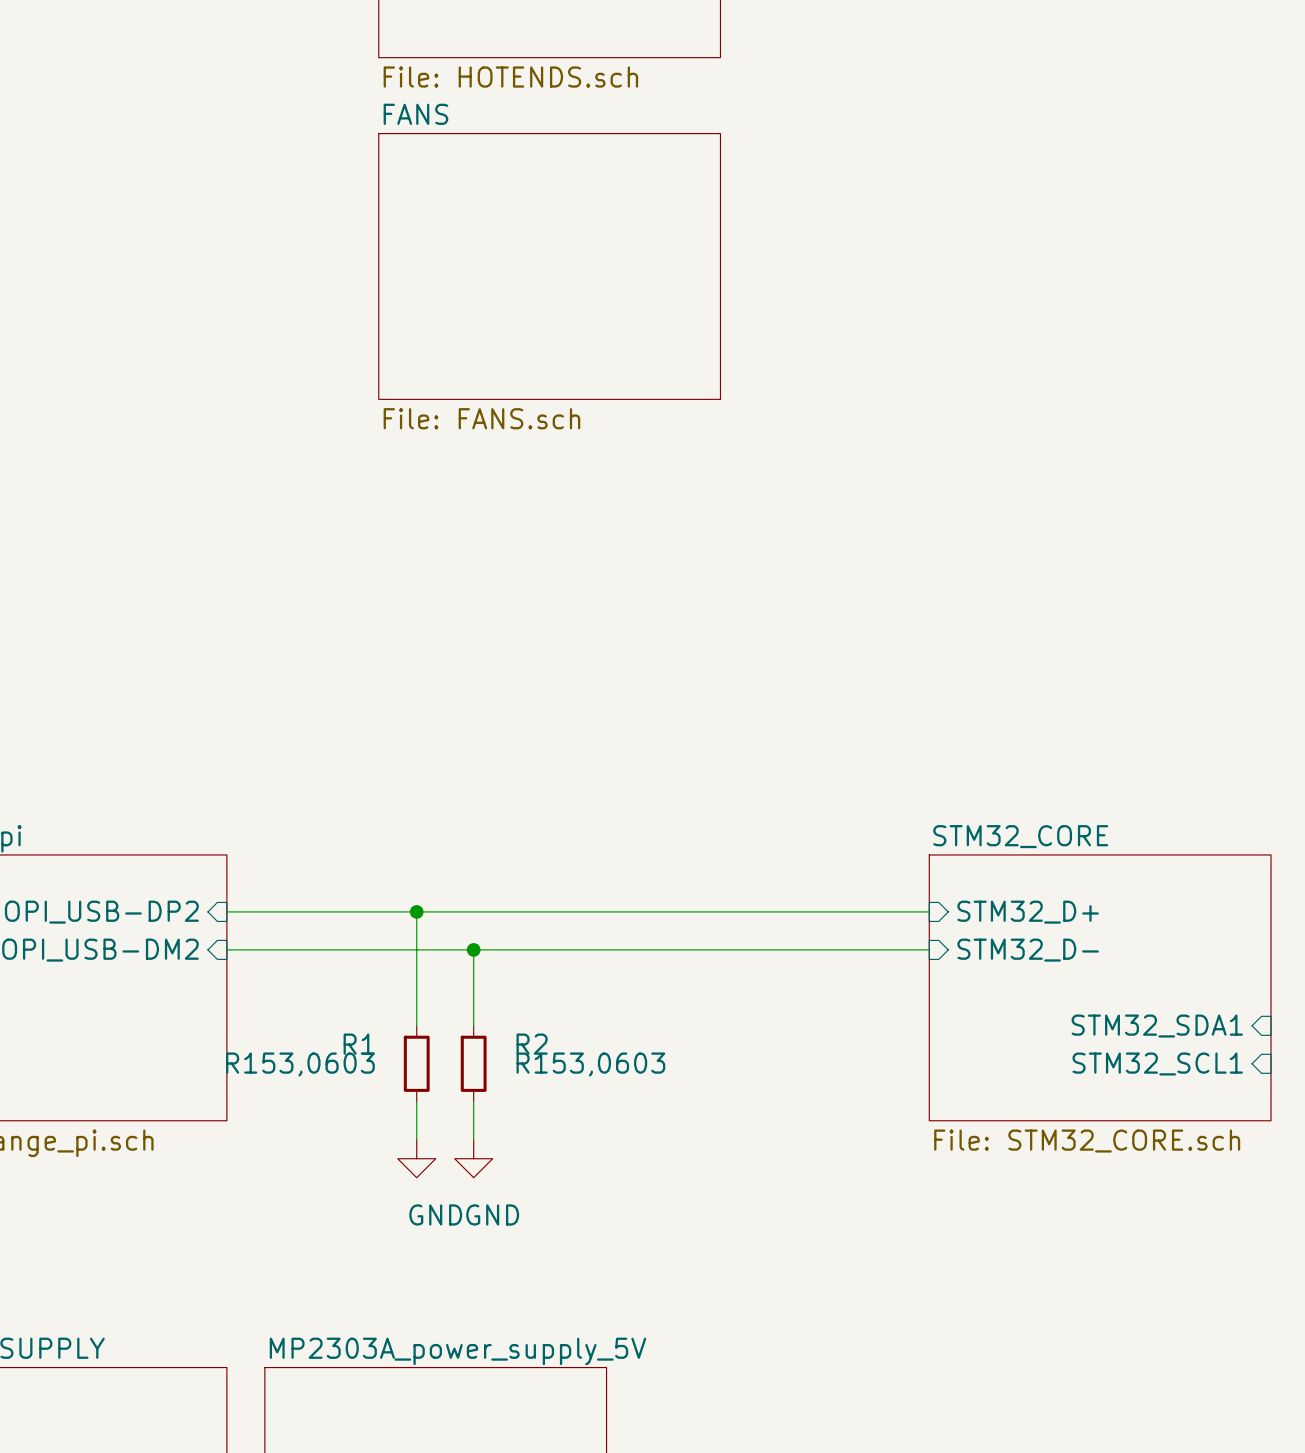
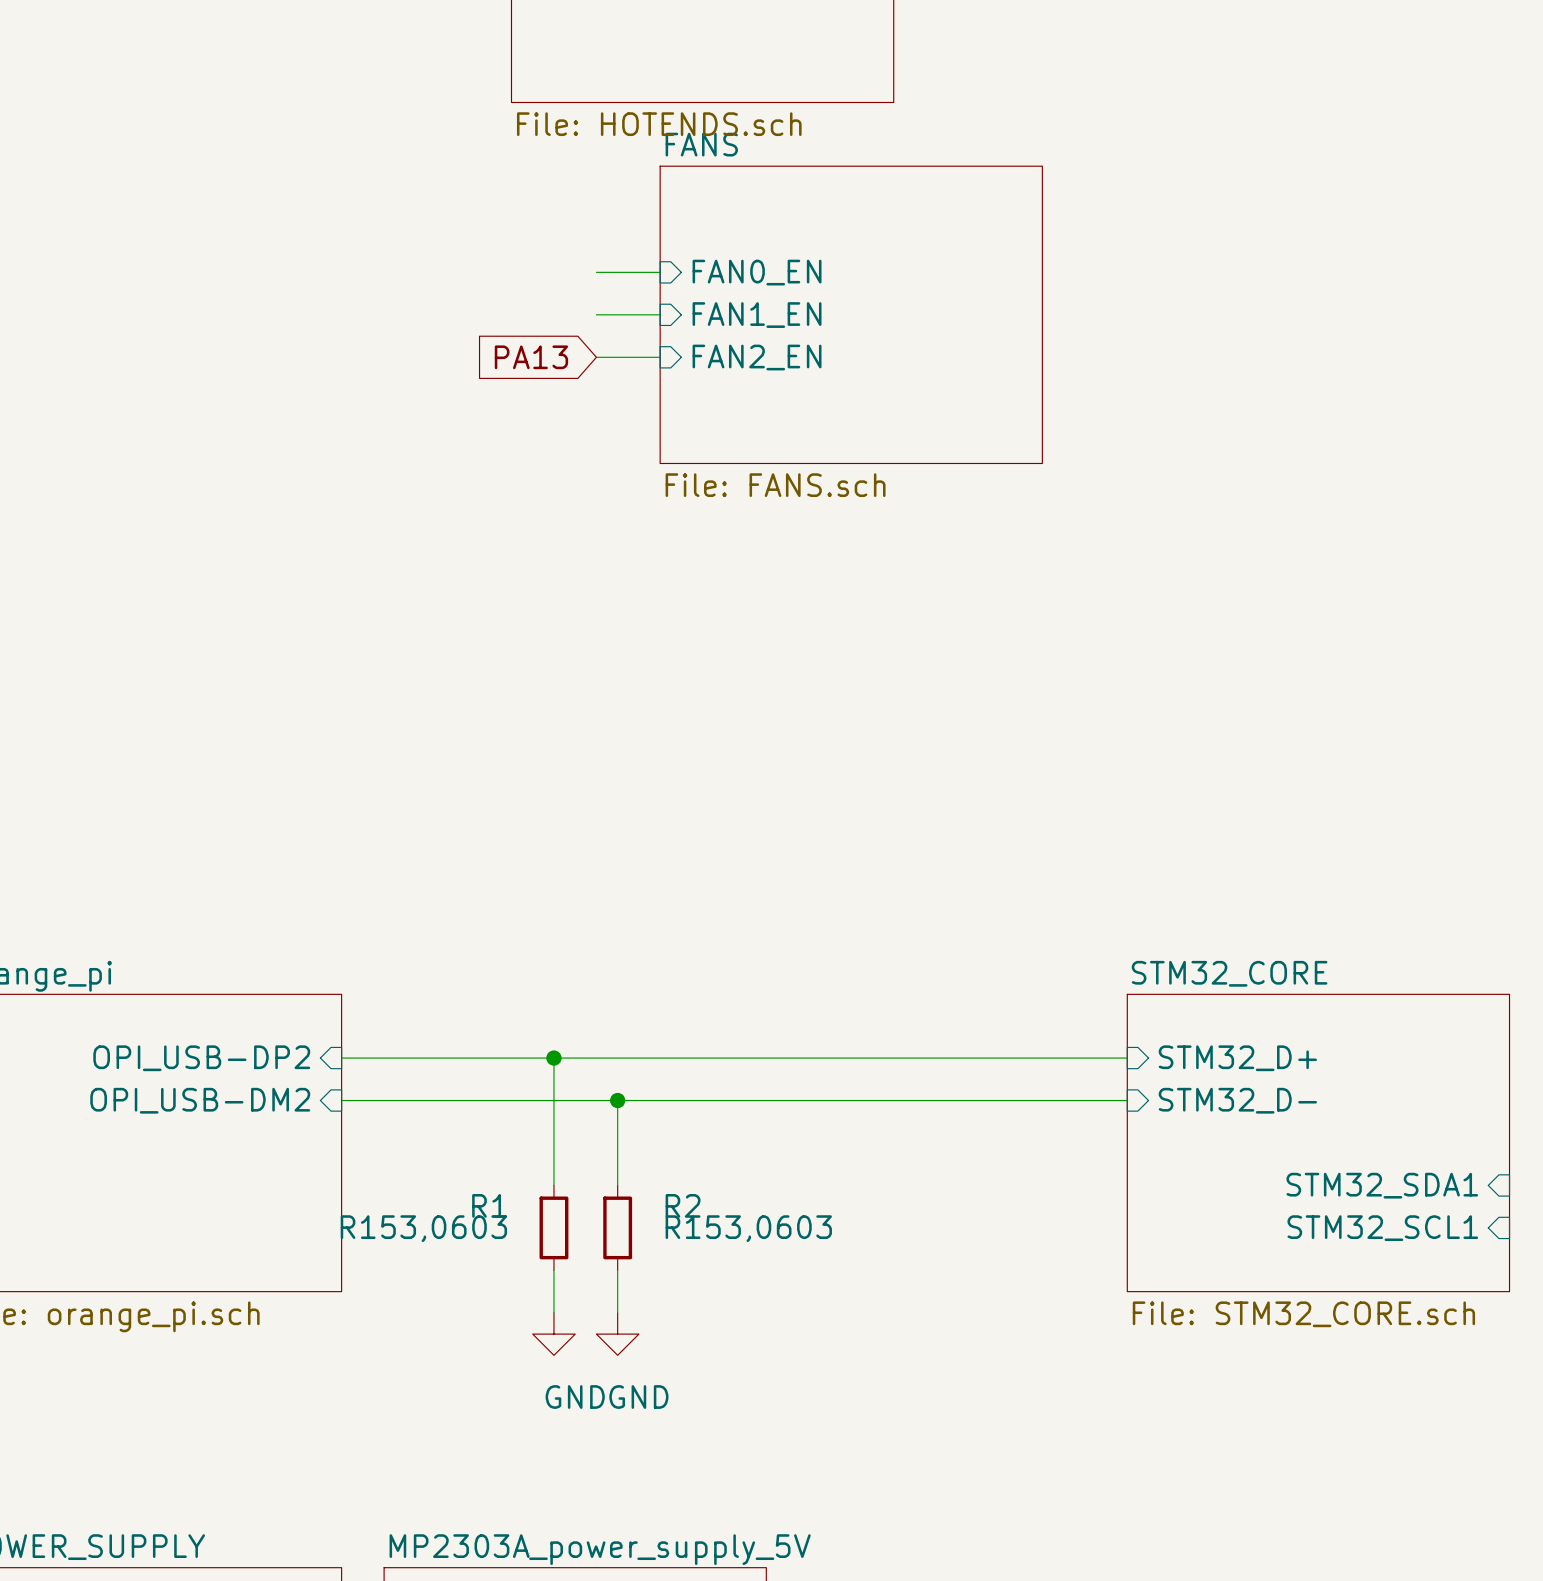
wire: none -> (596, 272) (660, 272)
sheet pin: none -> FAN0_EN (757, 272)
wire: none -> (596, 314) (660, 314)
sheet pin: none -> FAN1_EN (757, 315)
sheet FANS position: (549, 266) -> (851, 314)
global label: none -> PA13 (531, 357)
wire: none -> (596, 357) (660, 357)
sheet pin: none -> FAN2_EN (757, 357)

